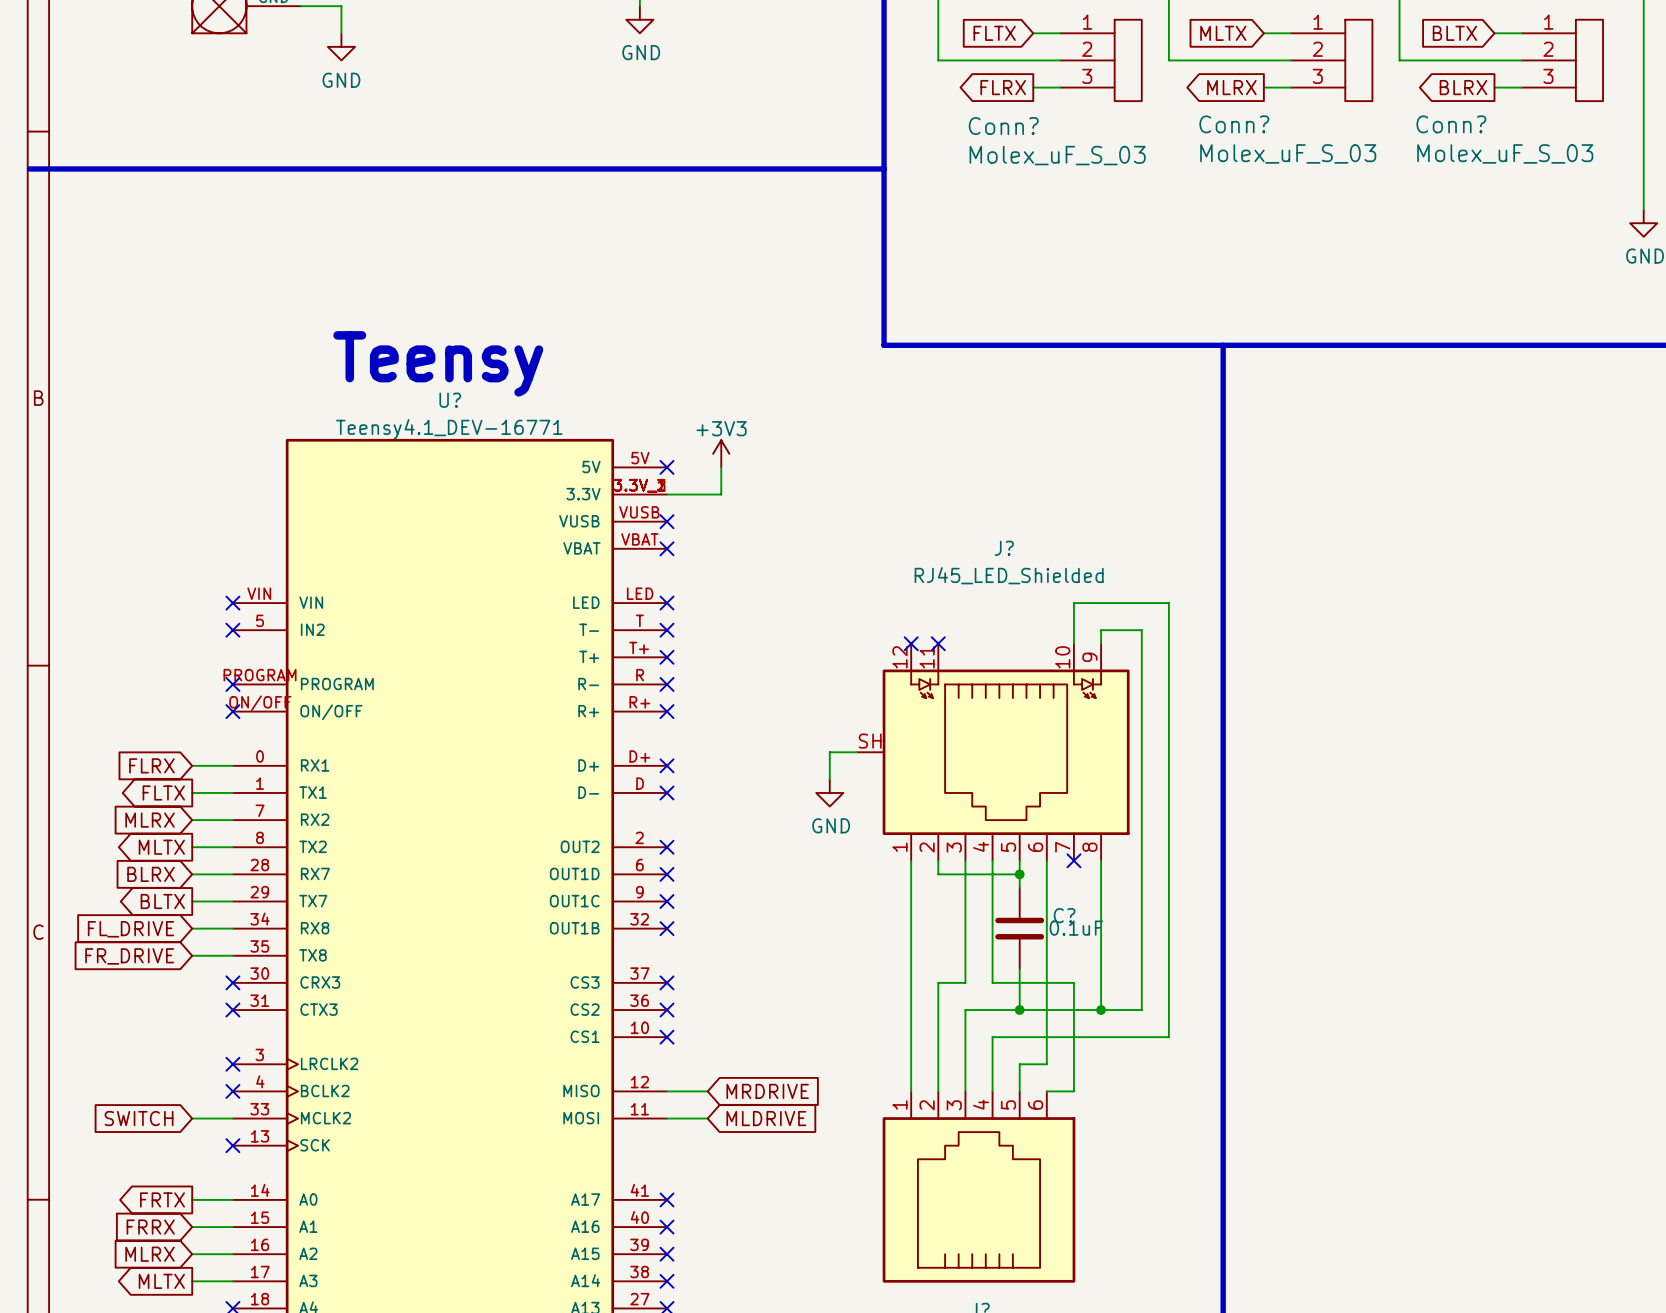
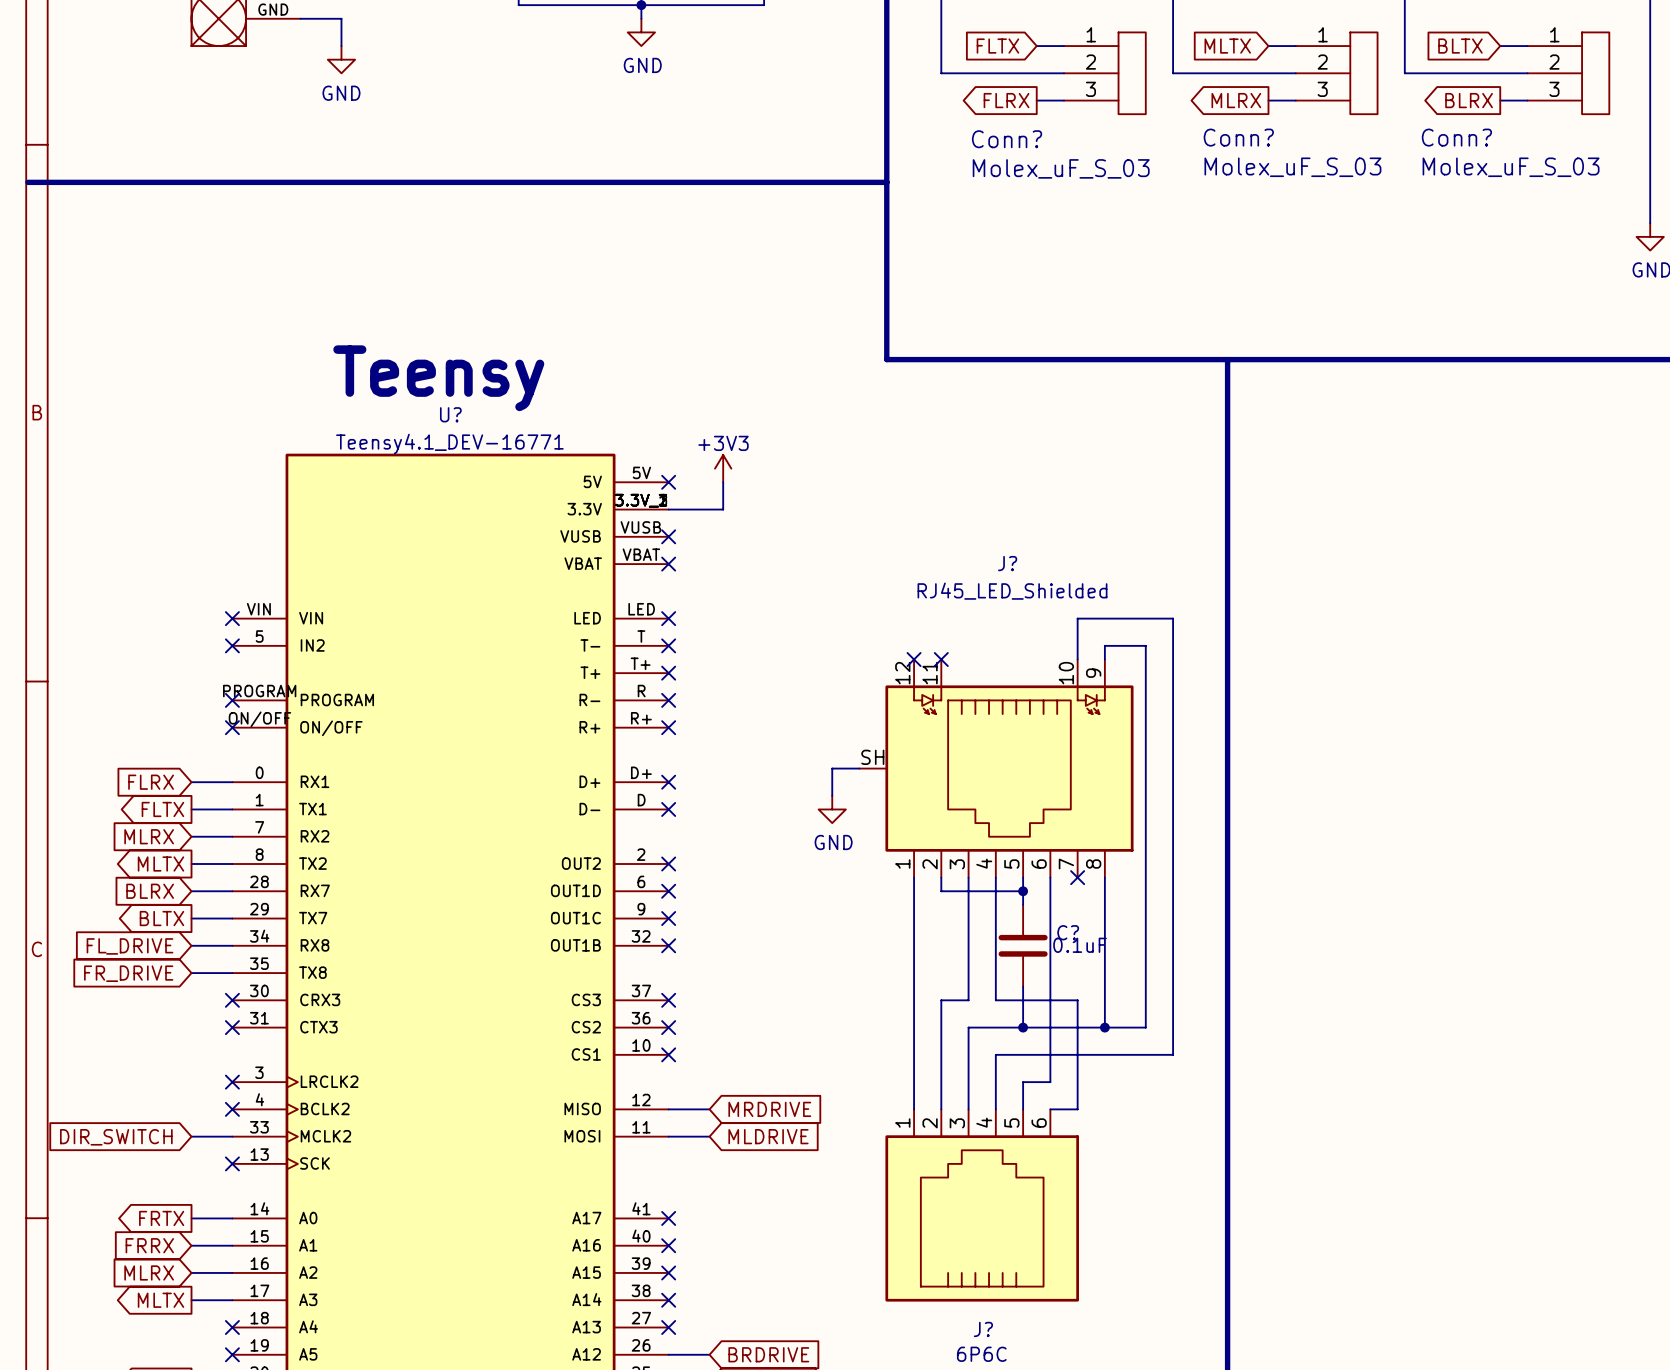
global label: SWITCH (139, 1118) -> DIR_SWITCH (116, 1137)

